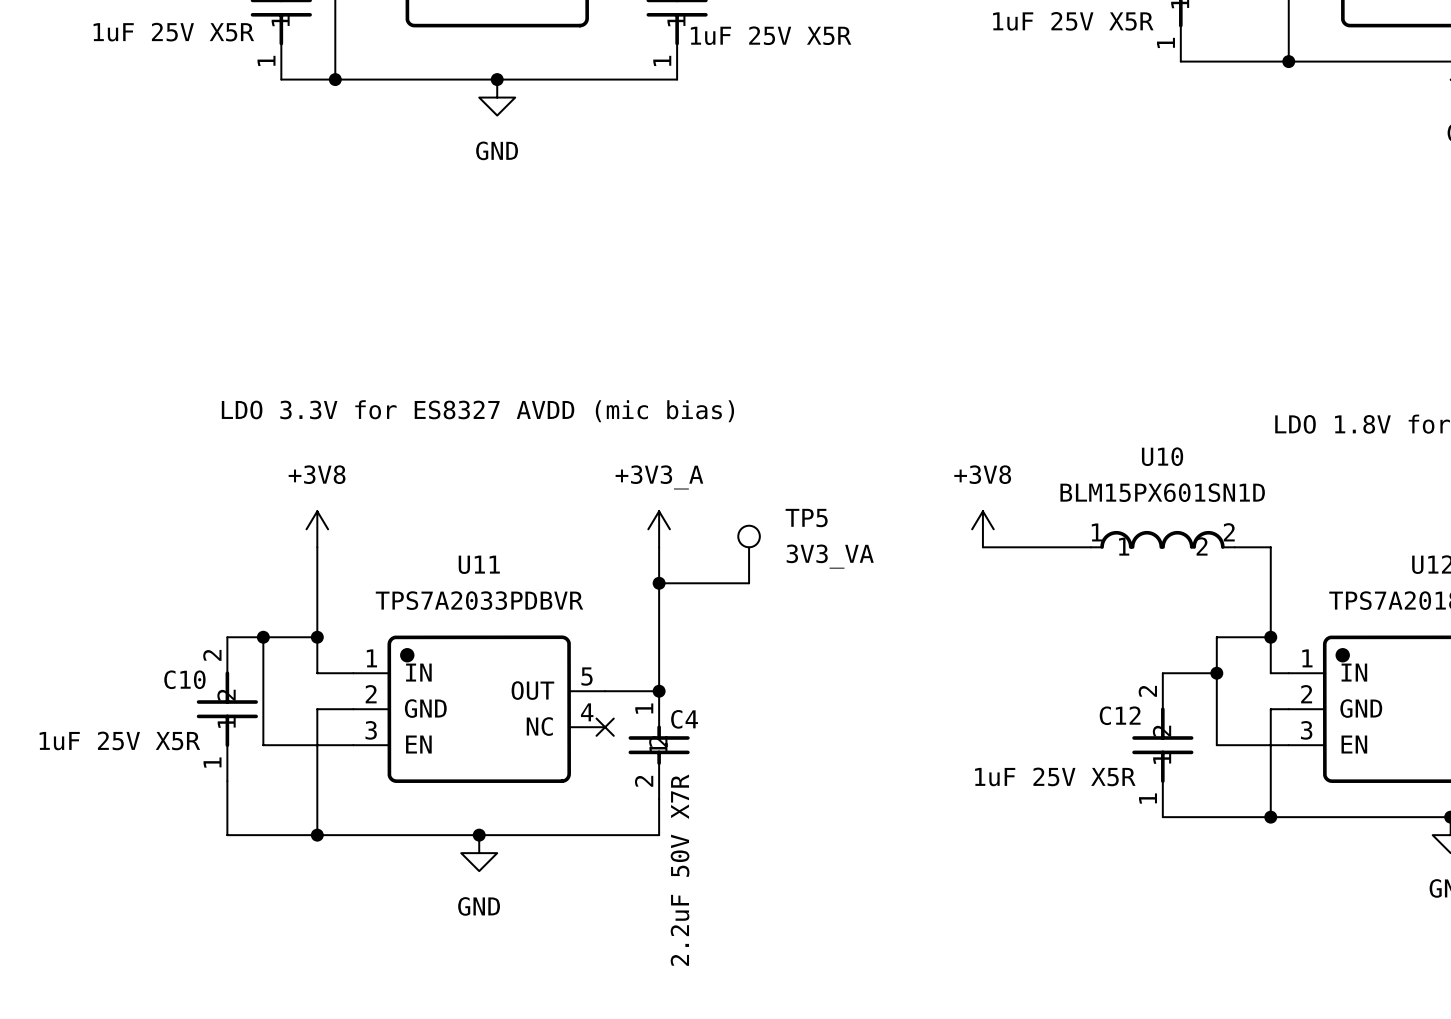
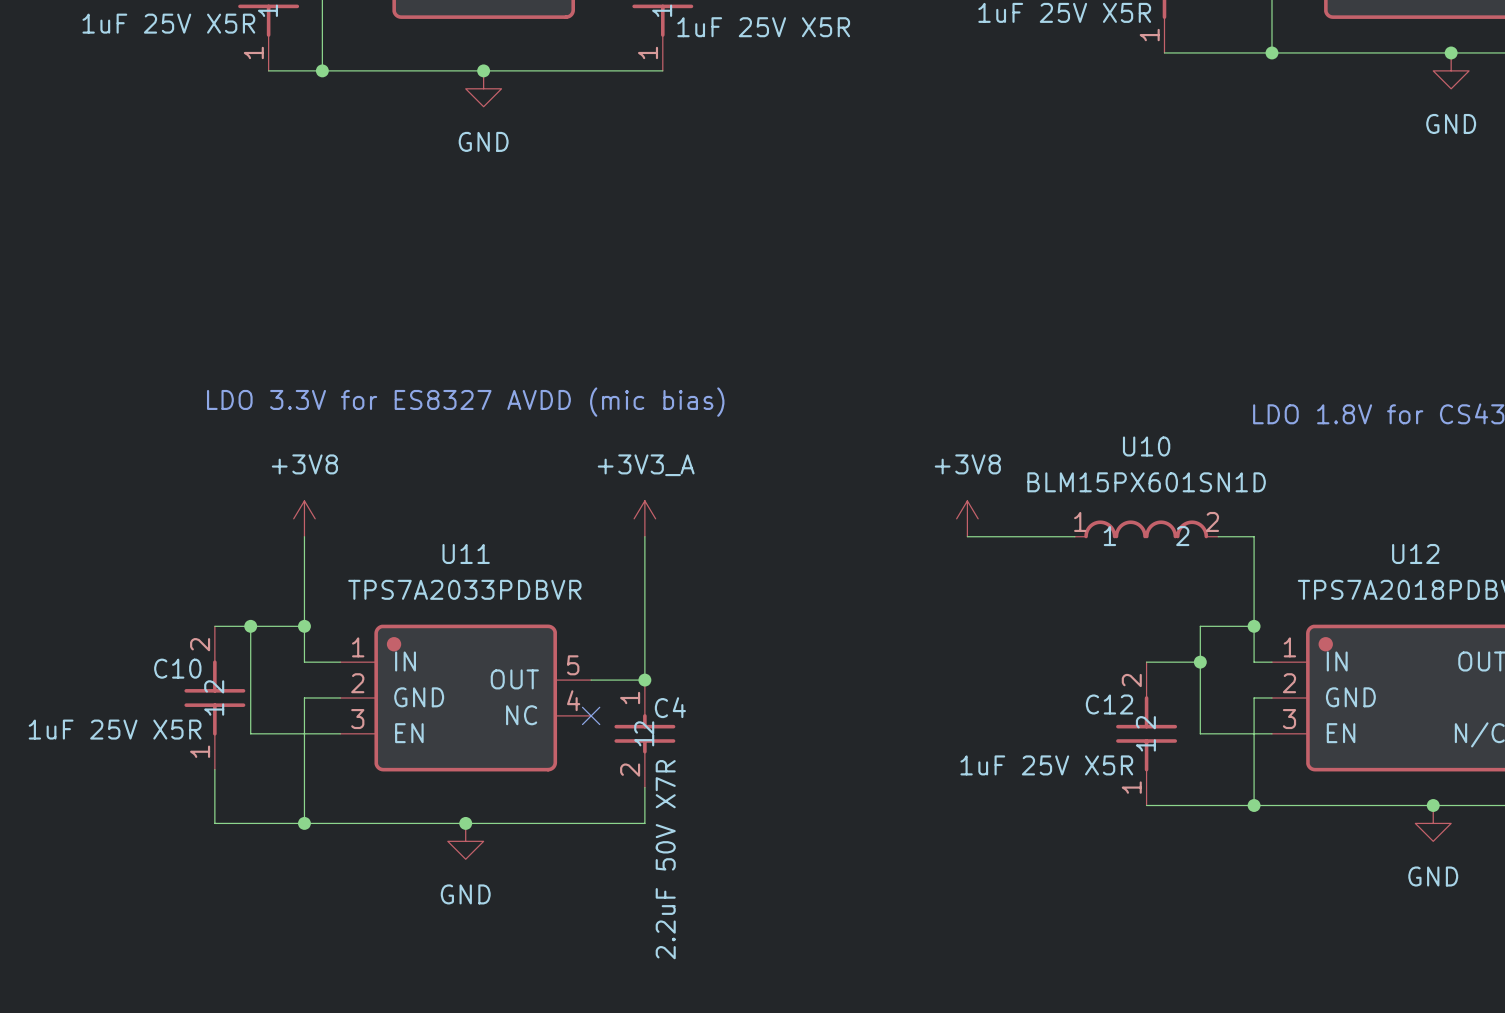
TP5: 3V3_VA (749, 554) -> none
wire: (659, 583) (749, 583) -> none
junction: (659, 583) -> none

